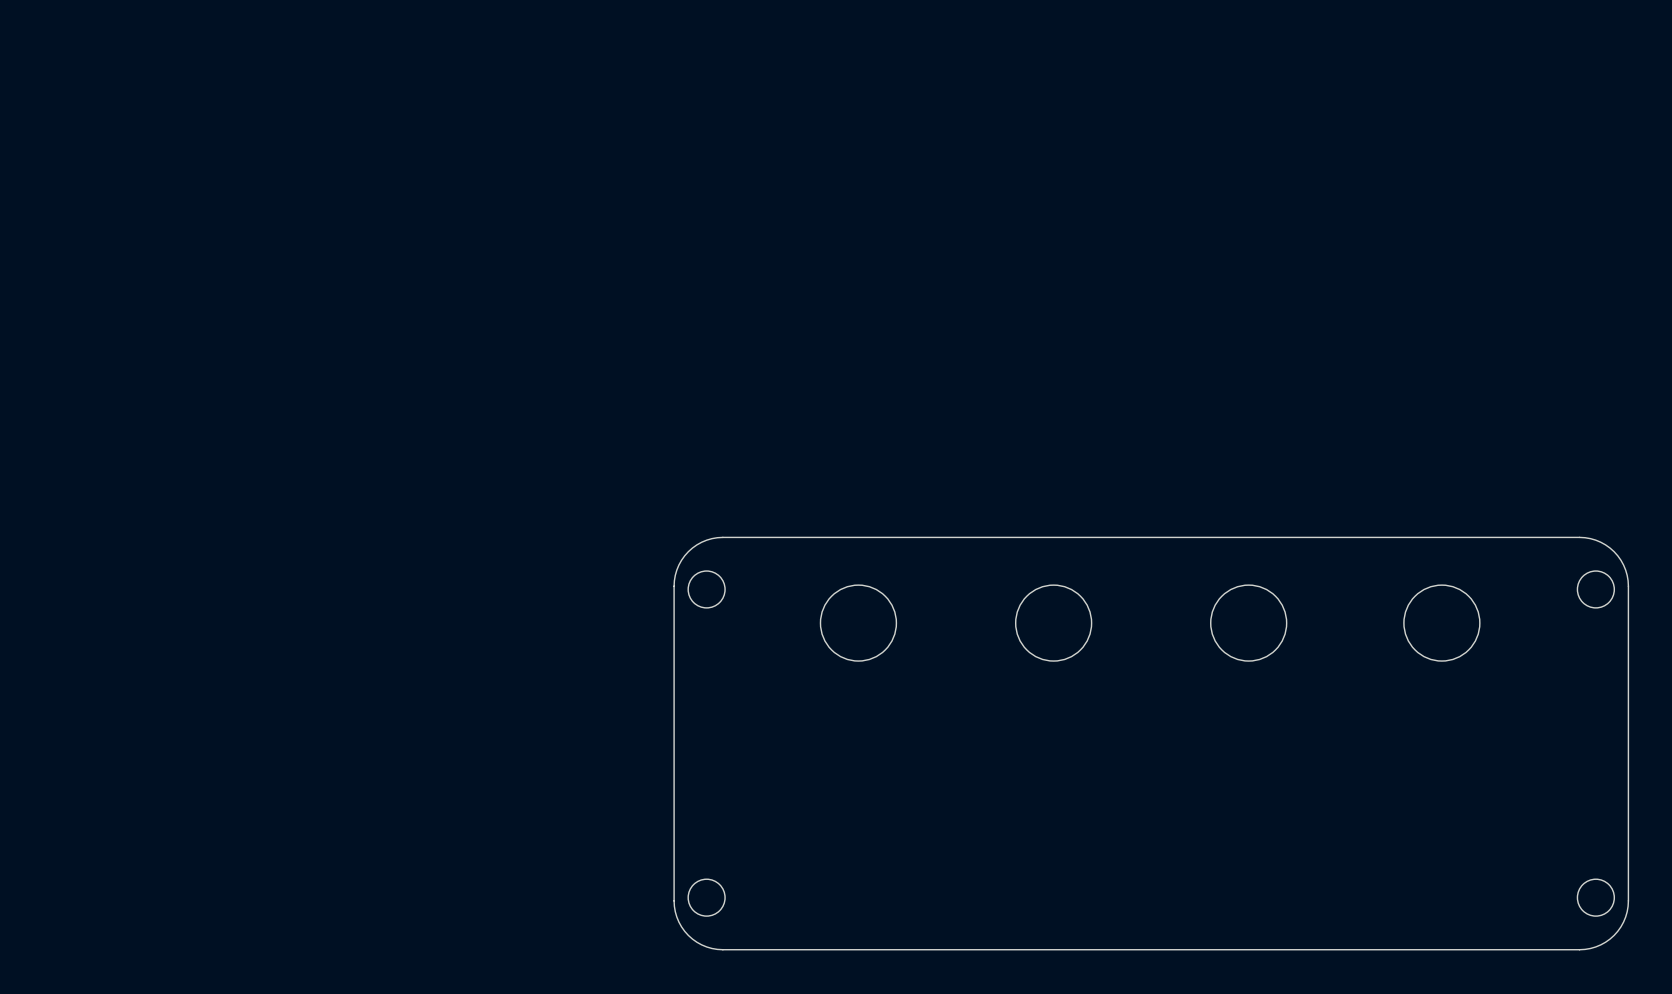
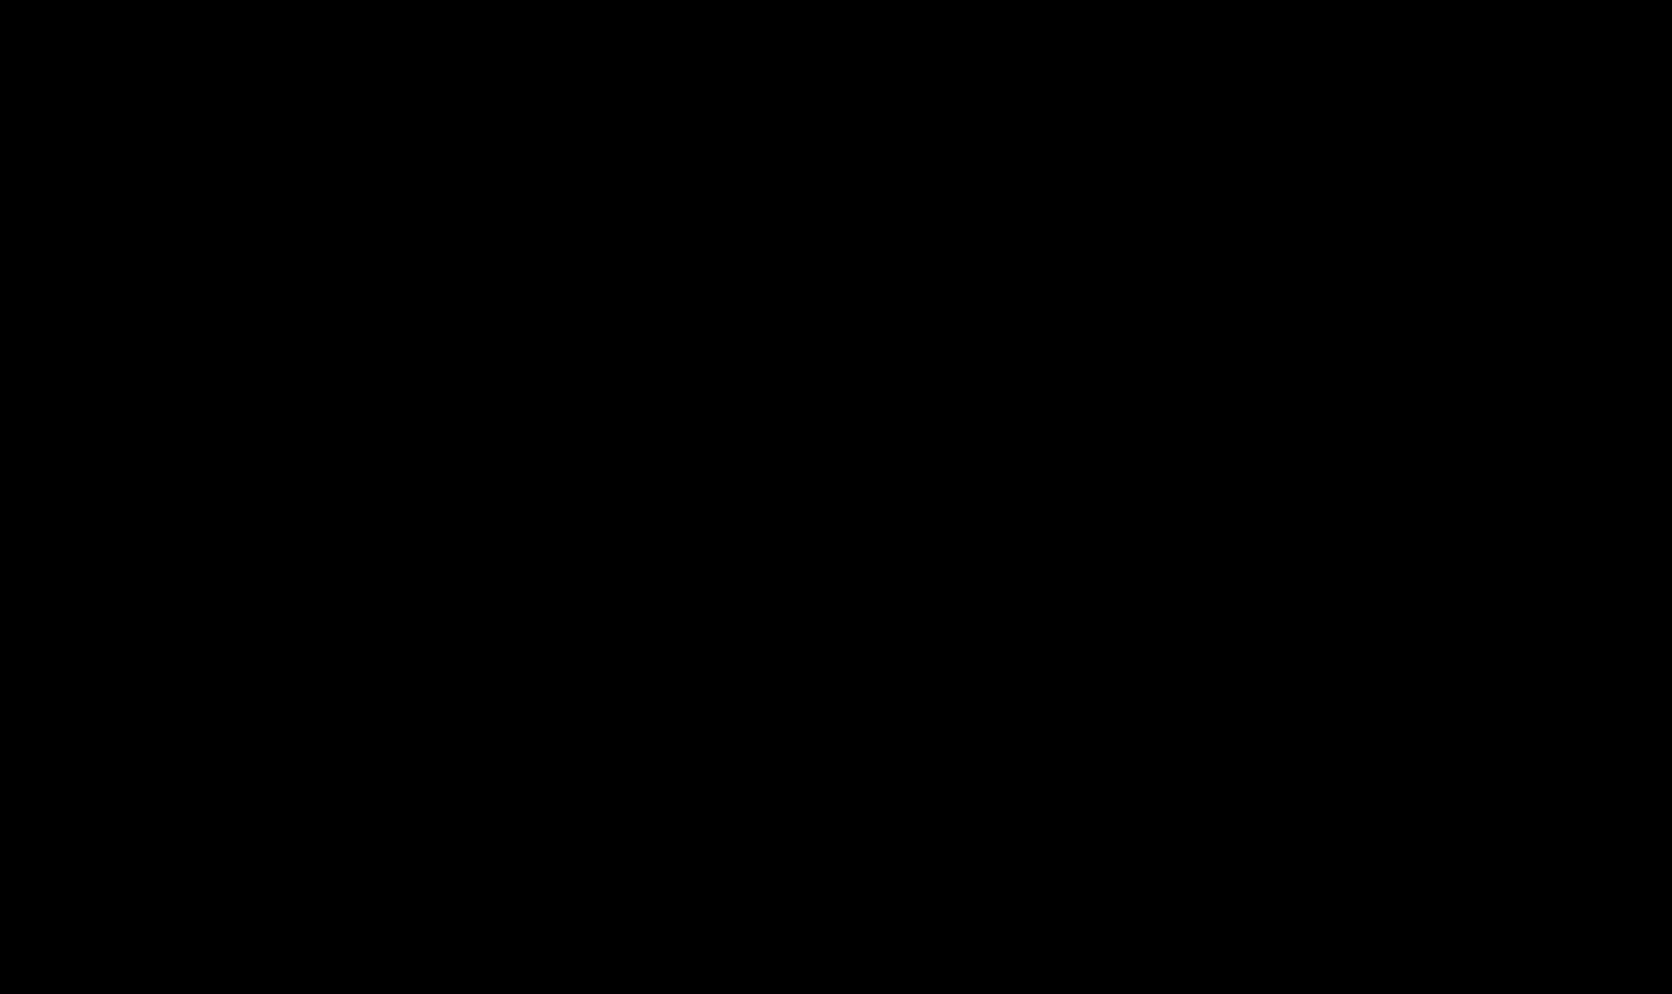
board edge: (722, 537) (1579, 537) (1600, 542) (1610, 548) (1620, 560) (1628, 580) (1628, 900) (1623, 922) (1617, 931) (1605, 942) (1590, 948) (1579, 949) (722, 949) (701, 944) (692, 939) (681, 926) (674, 906) (674, 586) (678, 565) (688, 551) (701, 542) (722, 537) -> none
round board edge: [687, 570, 726, 609] -> none
round board edge: [1576, 570, 1615, 609] -> none
round board edge: [819, 584, 897, 662] -> none
round board edge: [1015, 584, 1093, 662] -> none
round board edge: [1210, 584, 1288, 662] -> none
round board edge: [1403, 584, 1481, 662] -> none
round board edge: [687, 878, 726, 917] -> none
round board edge: [1576, 878, 1615, 917] -> none

